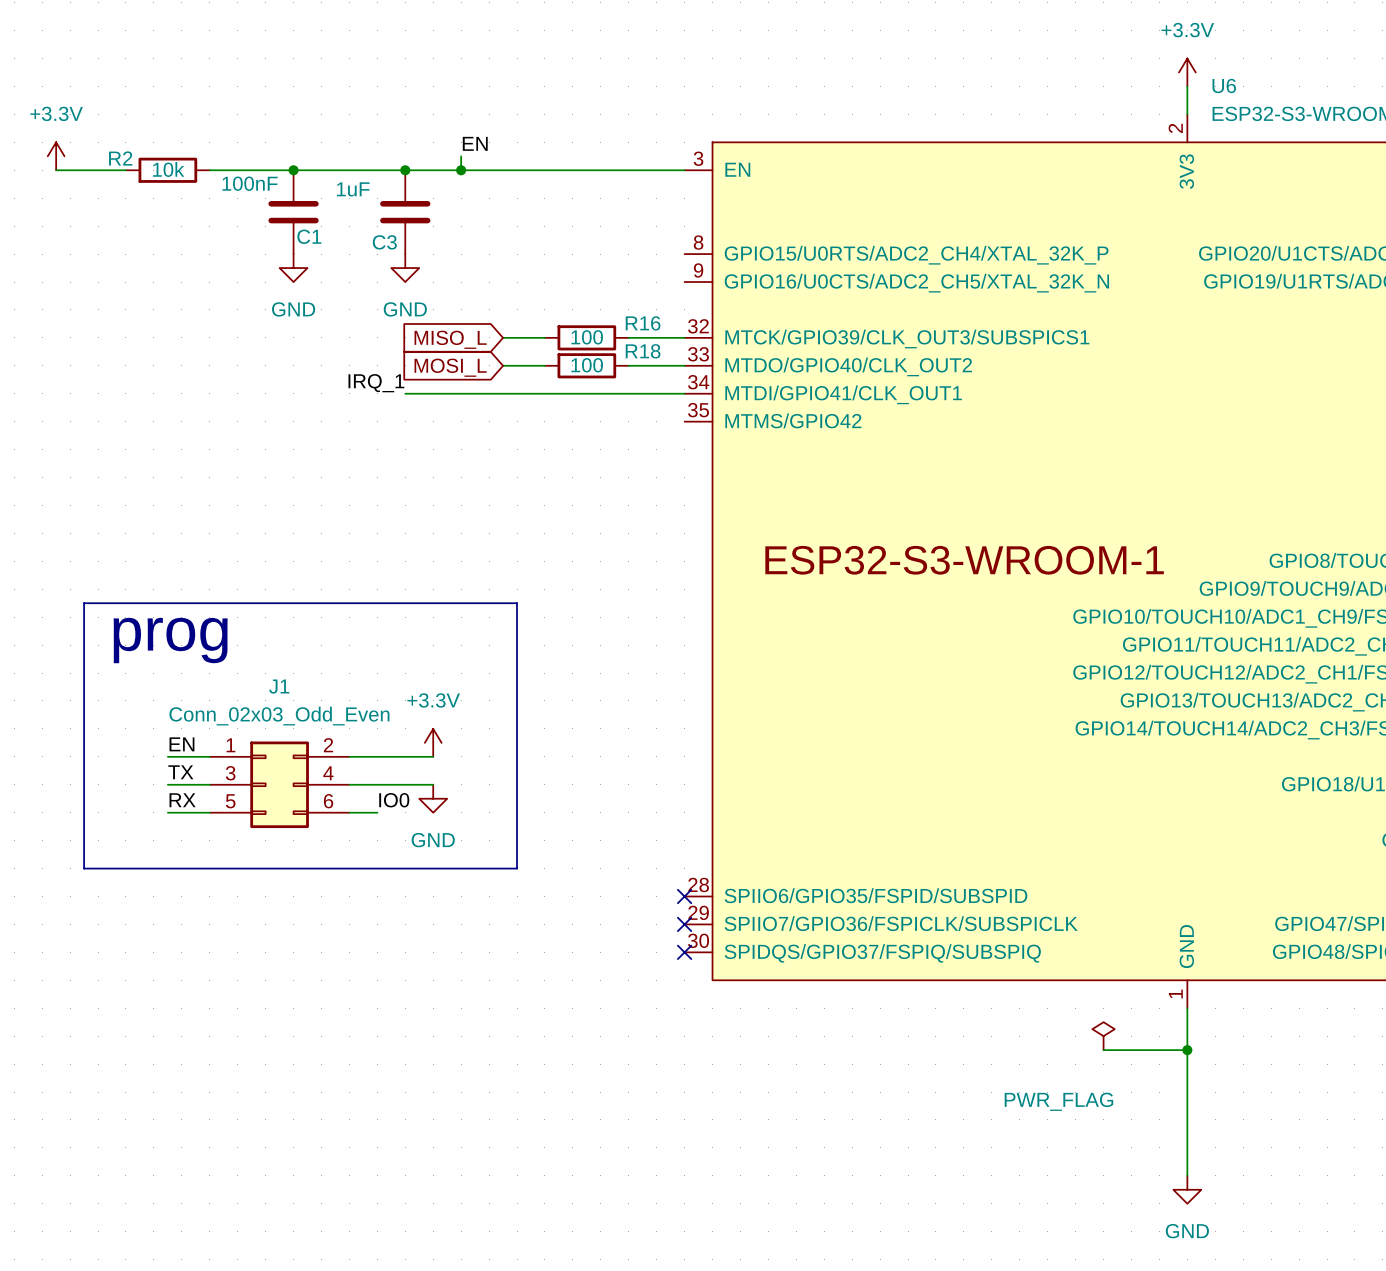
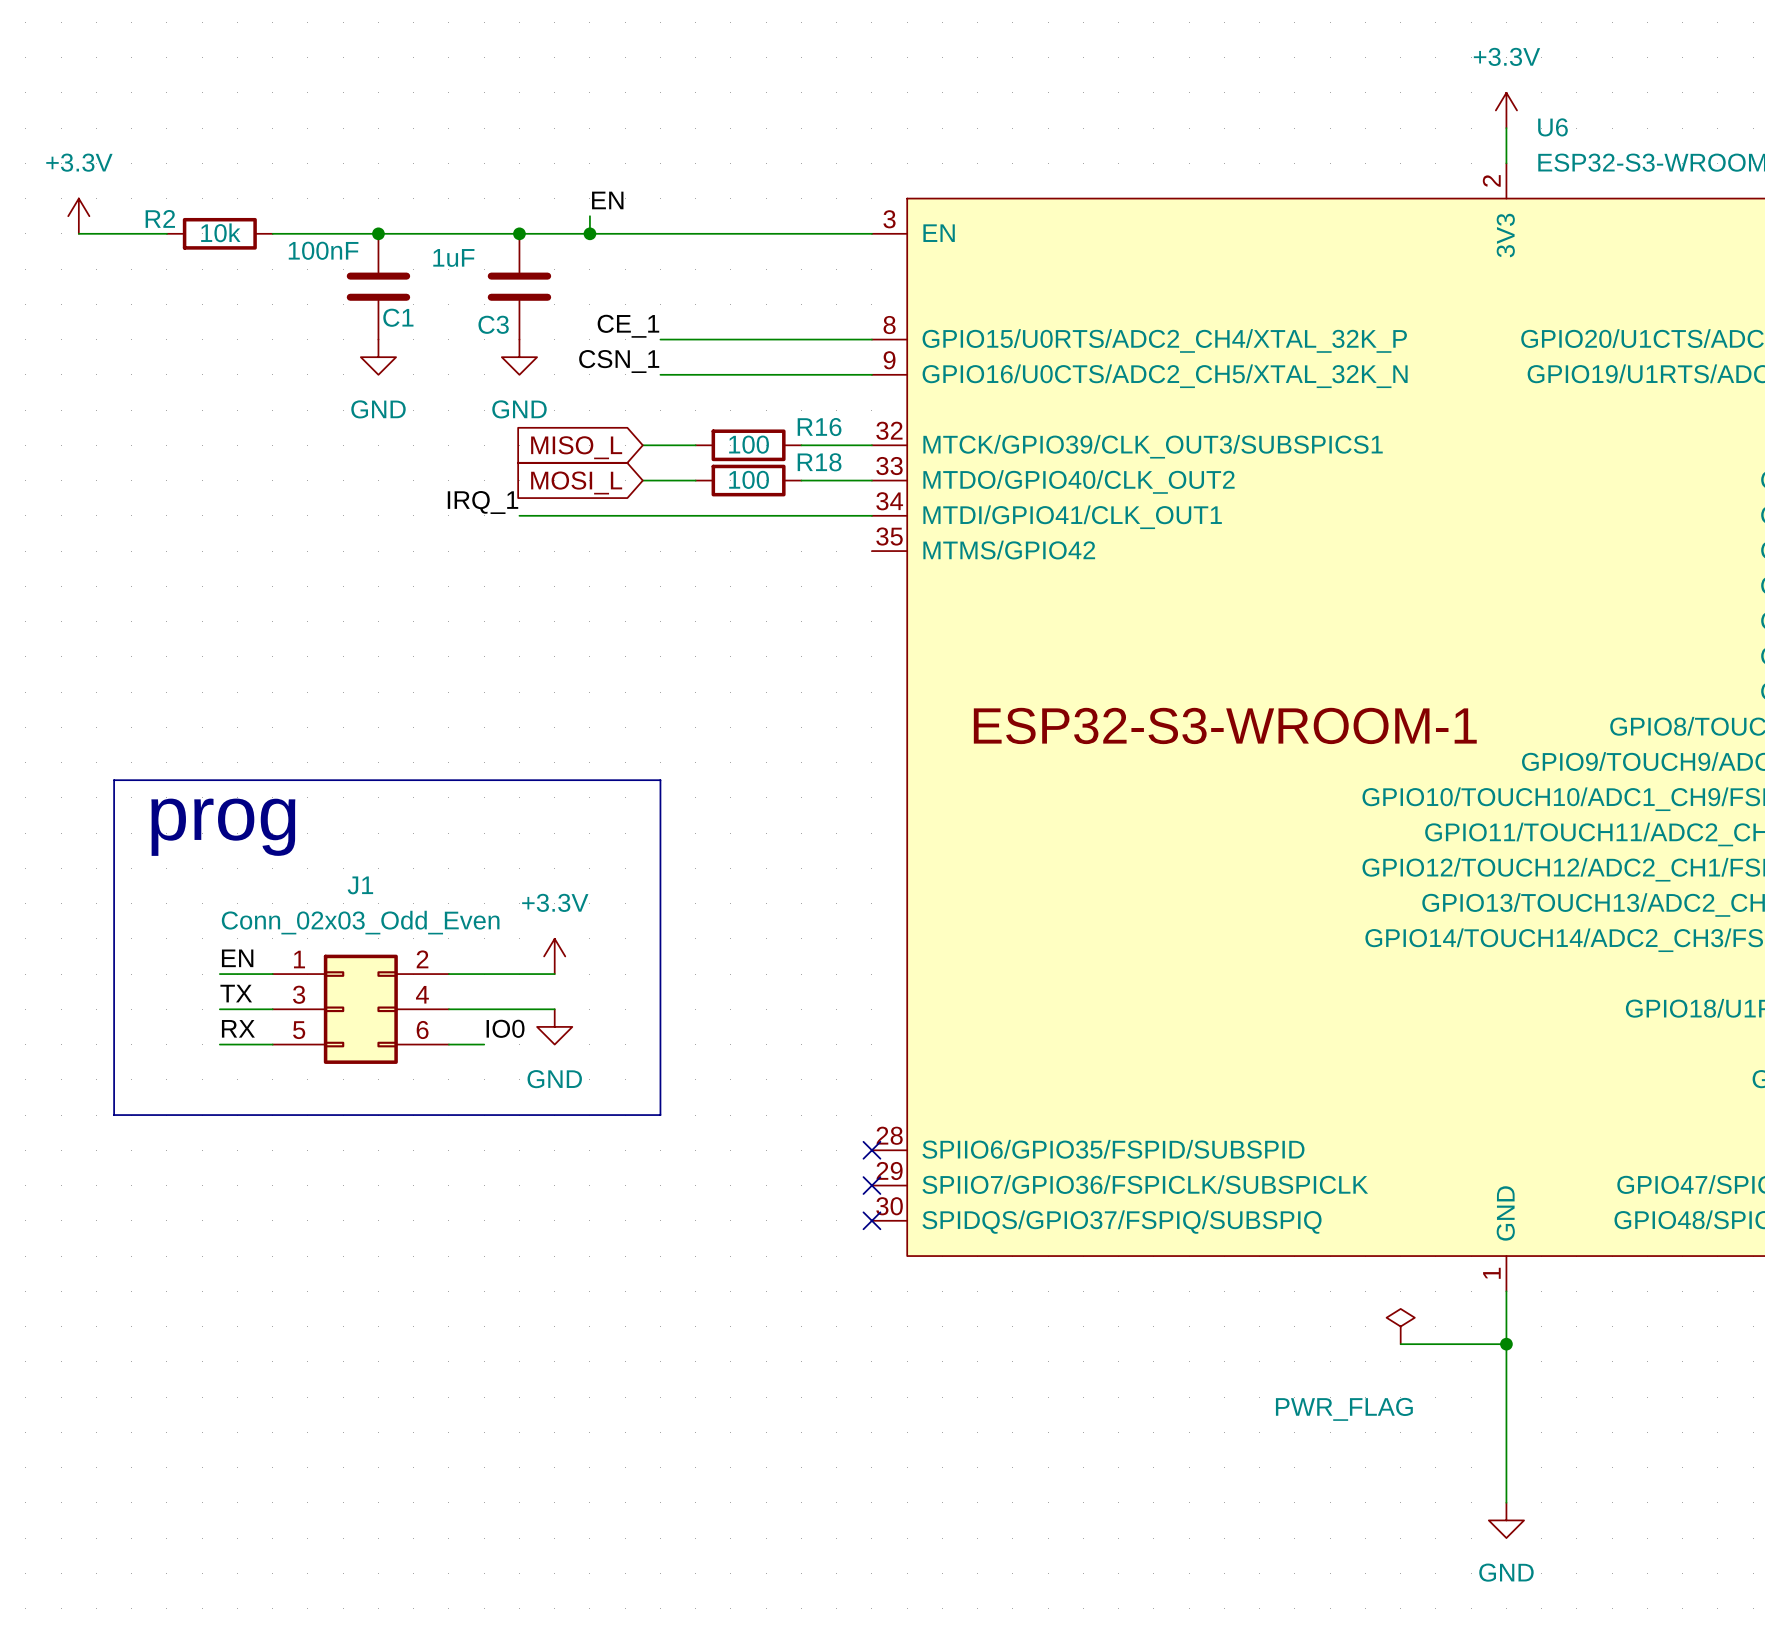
label: none -> CE_1 (628, 326)
wire: none -> (660, 339) (871, 339)
label: none -> CSN_1 (619, 361)
wire: none -> (660, 374) (871, 374)

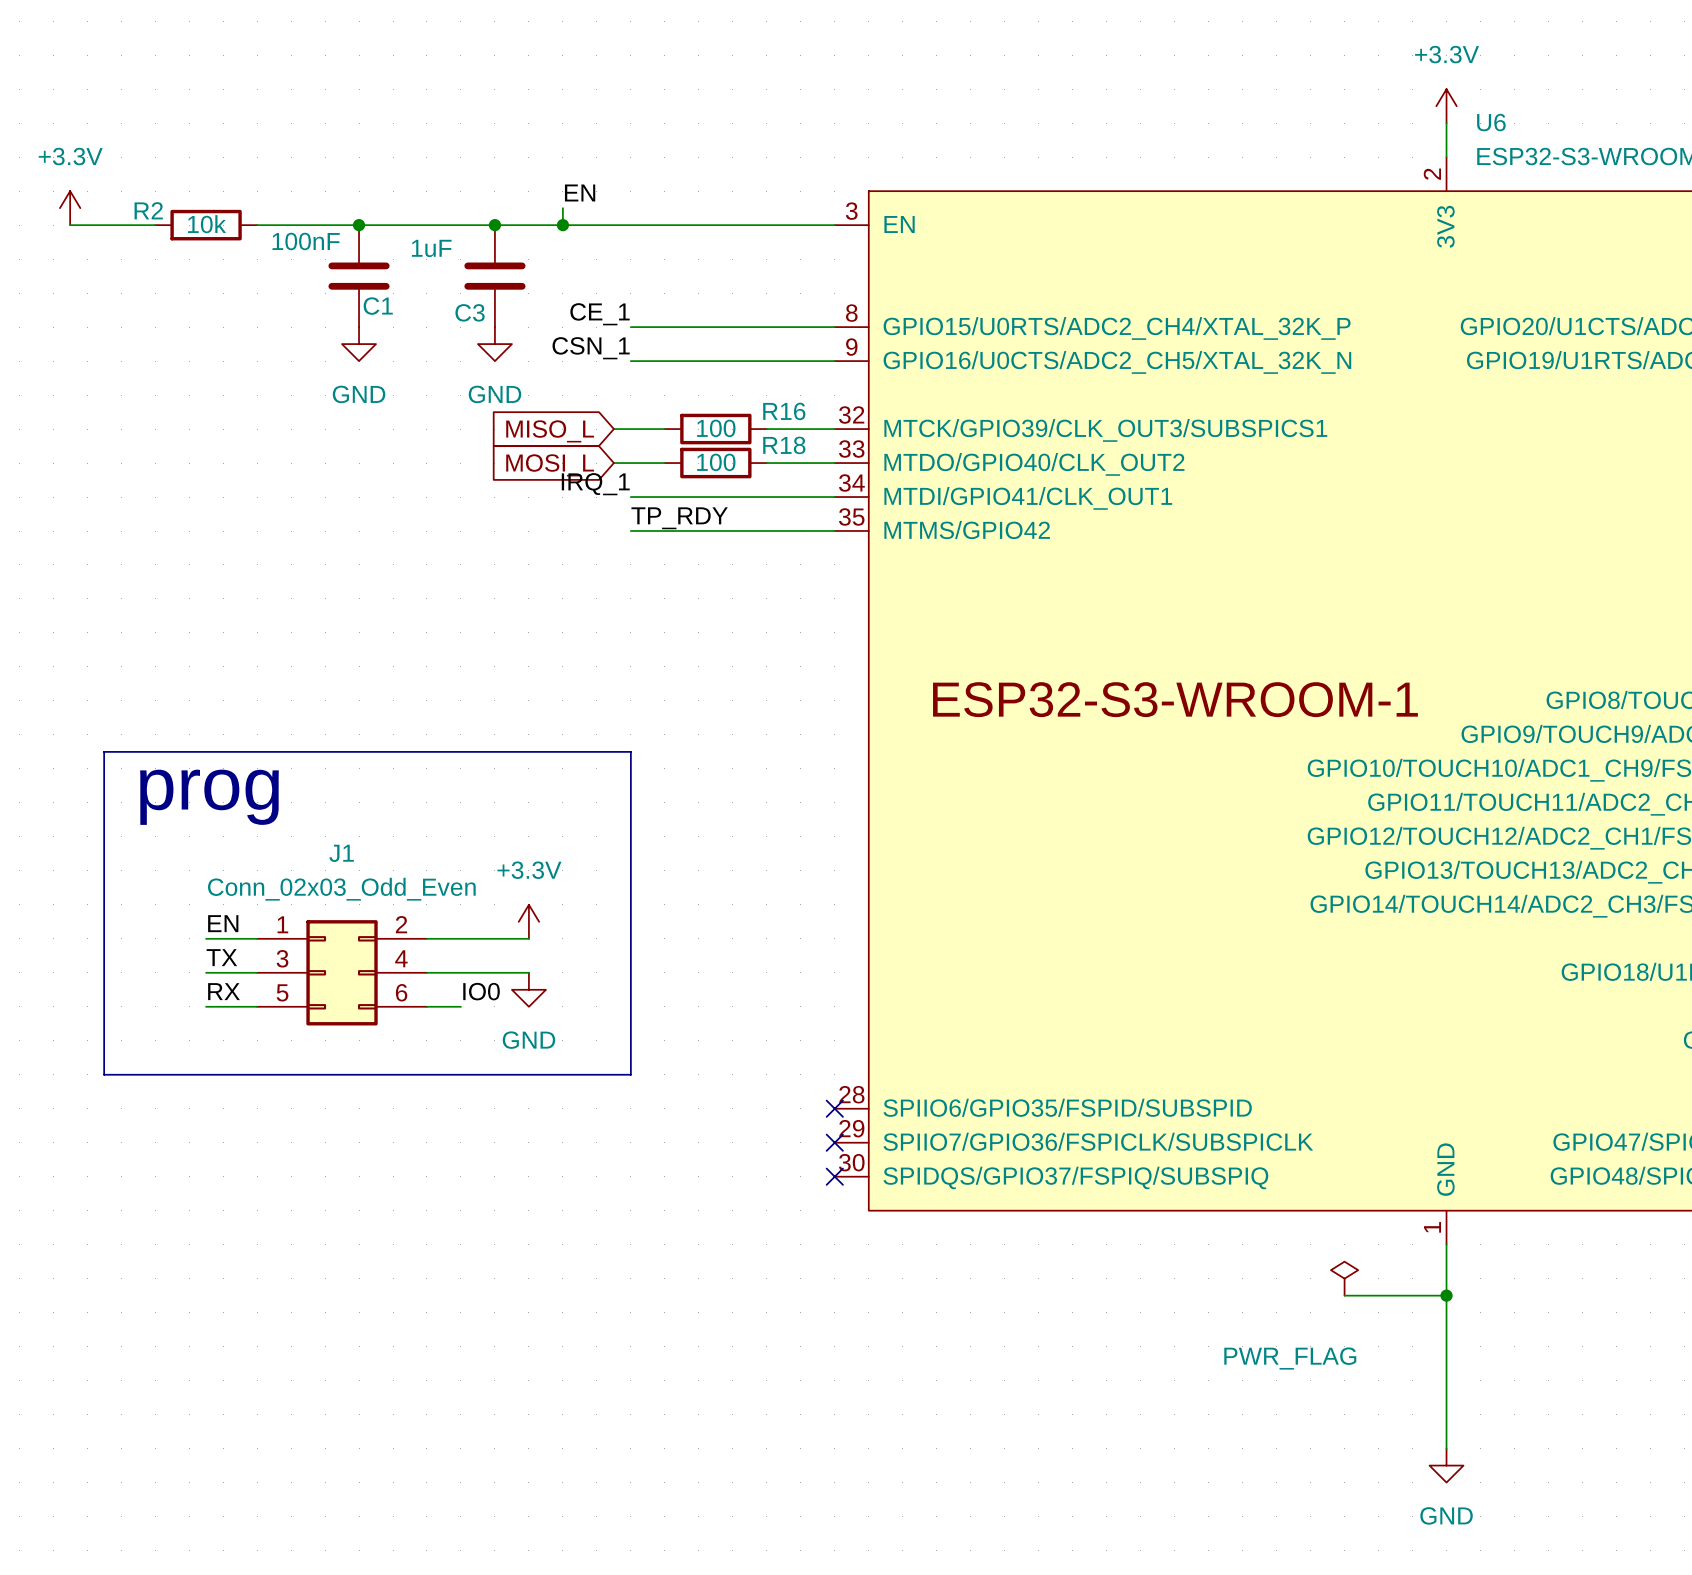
label position: IRQ_1 (482, 502) -> IRQ_1 (595, 484)
wire: (519, 515) (660, 515) -> none
label: none -> TP_RDY (679, 518)
wire: none -> (630, 531) (834, 531)

